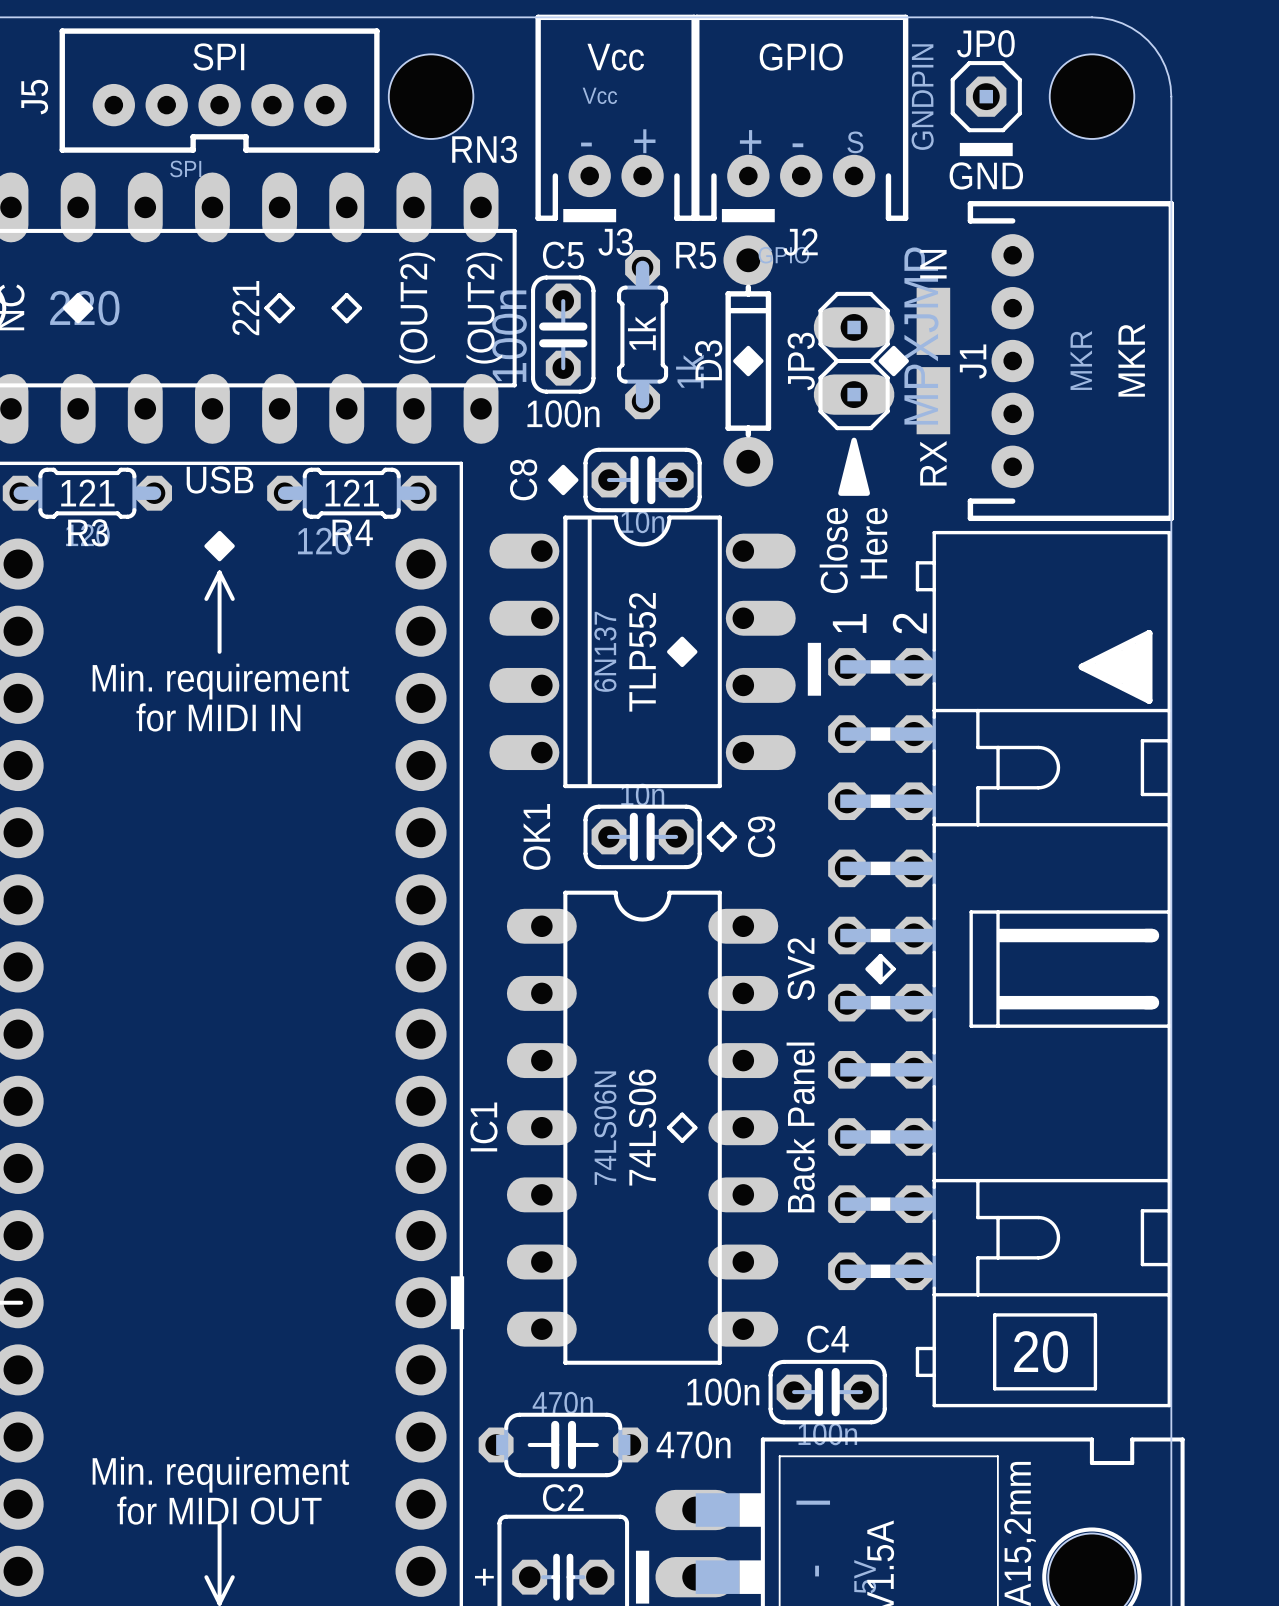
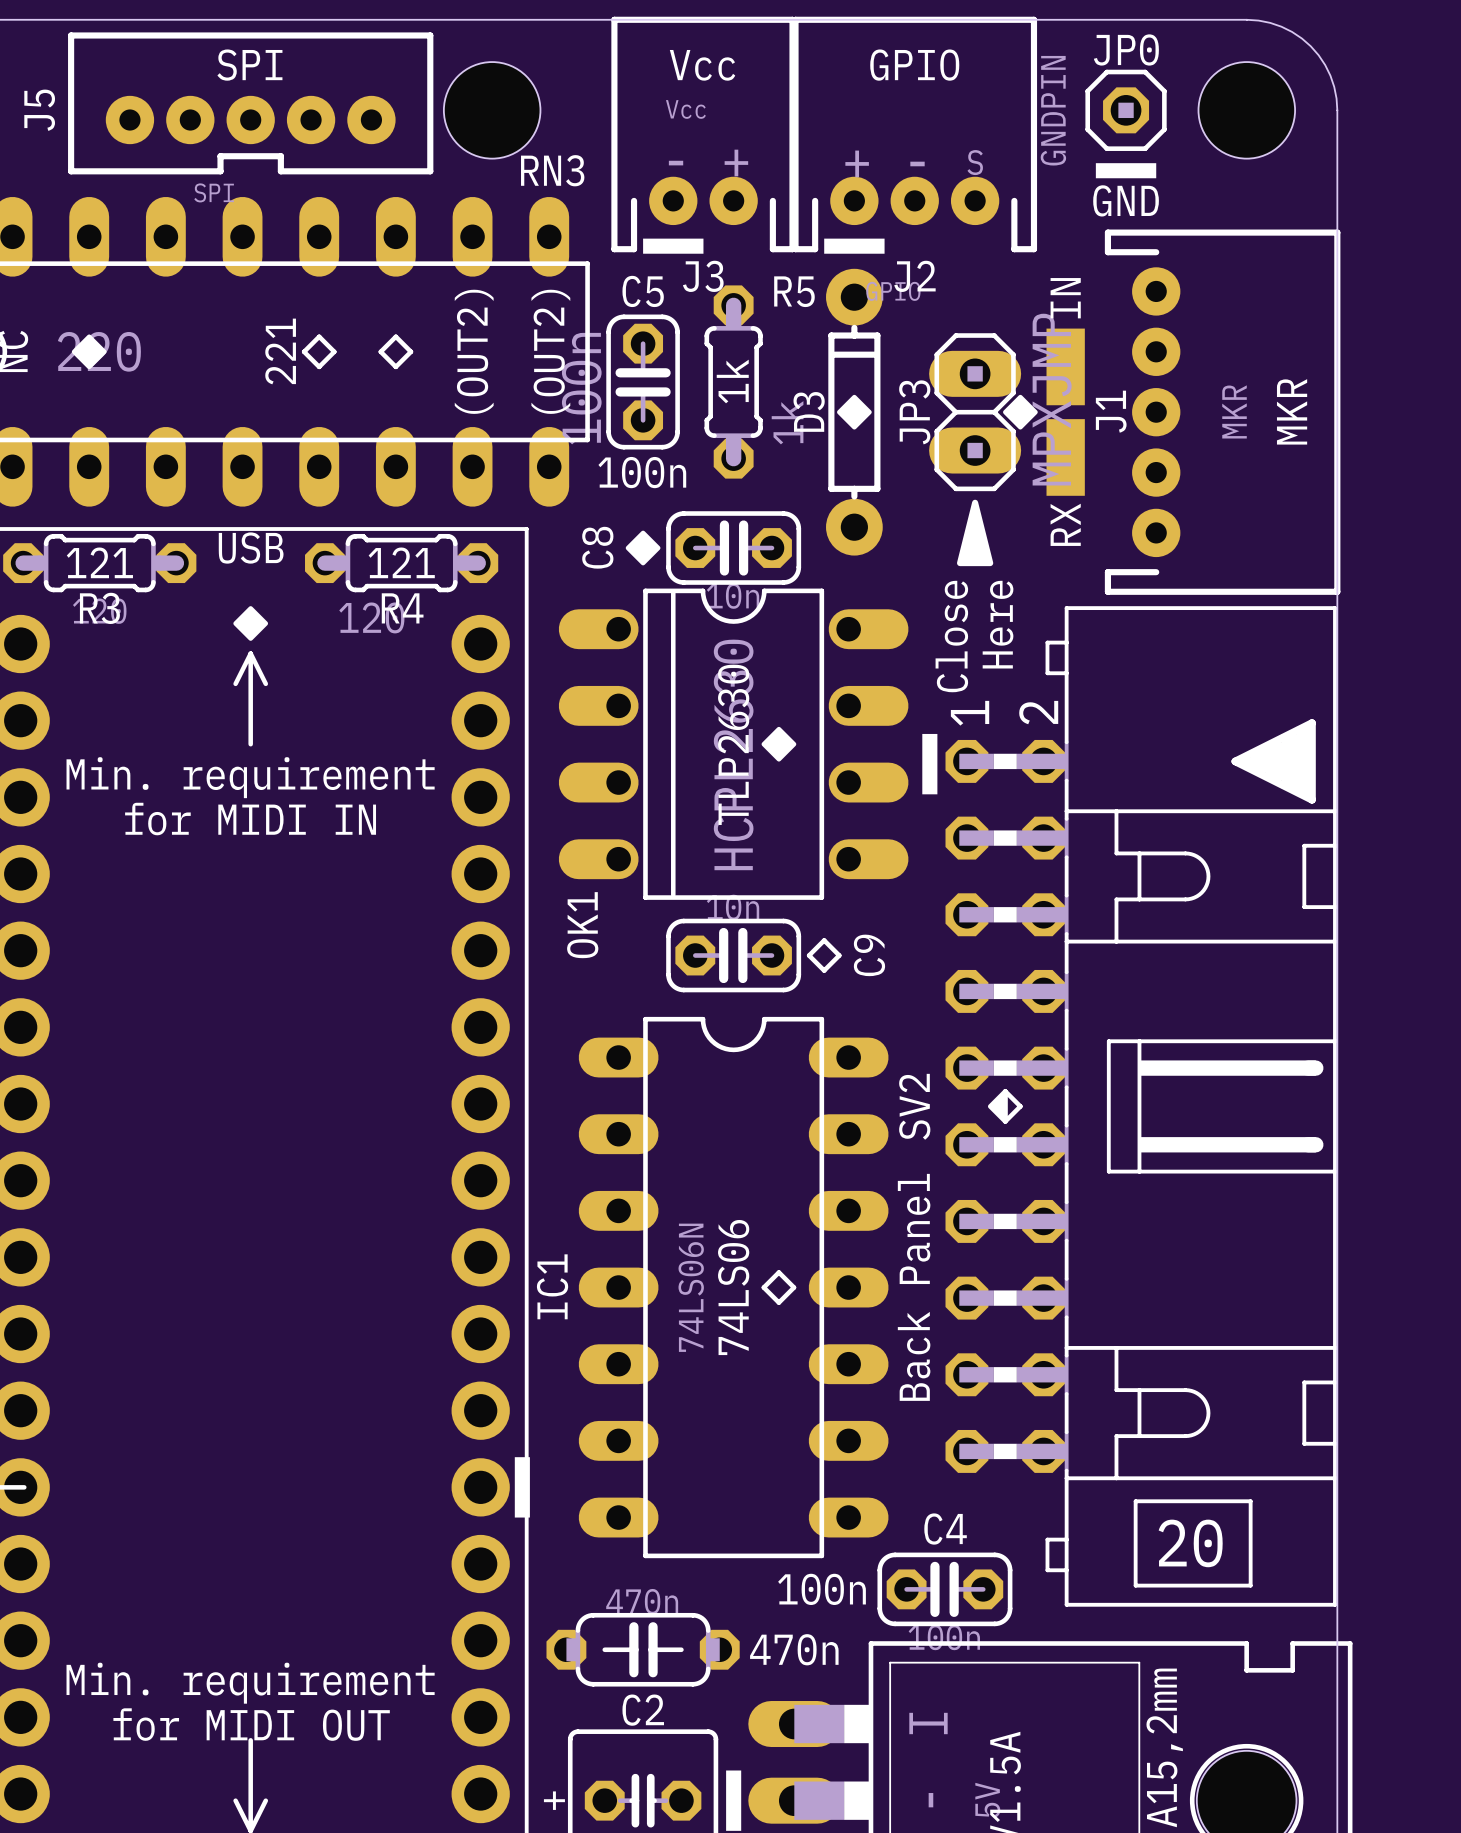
OK1 value: 6N137 (605, 651) -> HCPL2630 (733, 754)
text: TLP552 (642, 652) -> TLP2630 (733, 744)
OK1 name position: OK1 (536, 836) -> OK1 (582, 925)

